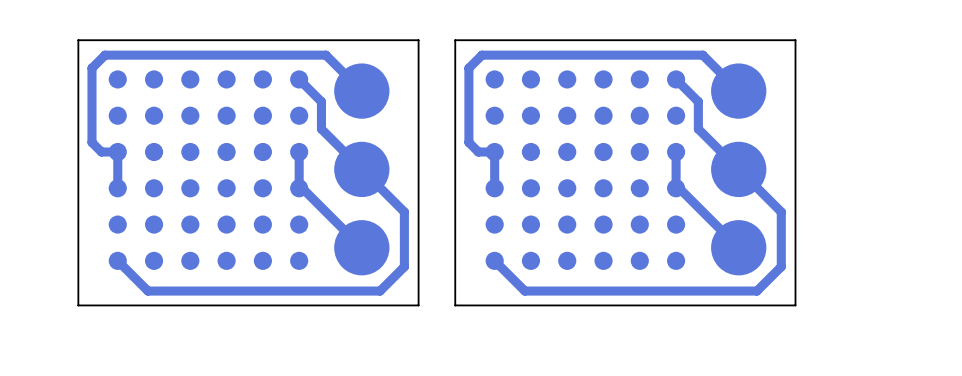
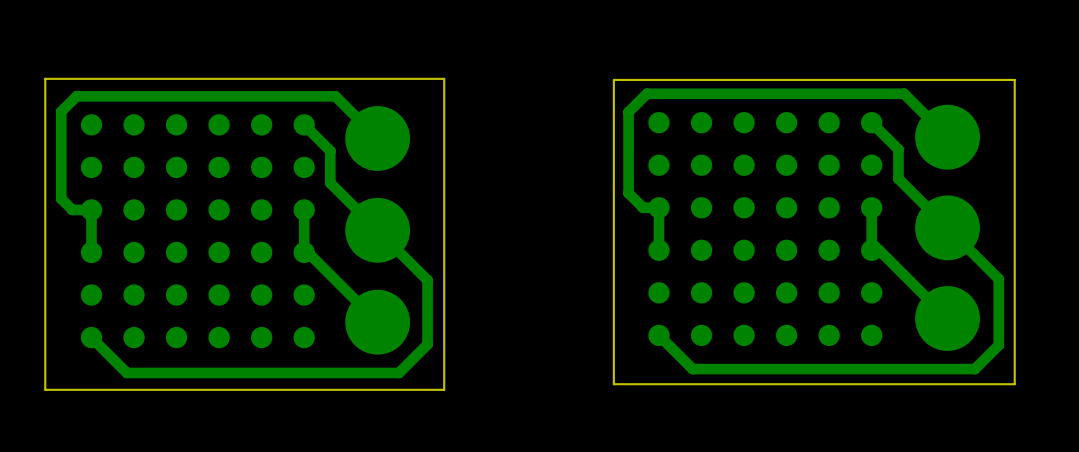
board edge: (455, 40) (795, 40) (795, 305) (455, 305) (455, 40) -> (613, 79) (613, 384) (1014, 384) (1014, 79) (613, 79)
bottom track: none -> (871, 122) (898, 149) (898, 178) (998, 279) (998, 345) (974, 369) (692, 369) (658, 335)
bottom track: (676, 79) (698, 101) (698, 129) (781, 211) (781, 266) (756, 291) (524, 291) (494, 260) -> none
bottom track: none -> (947, 137) (904, 93) (646, 93) (628, 112) (628, 193) (643, 207) (658, 207) (658, 250)
part: none -> (947, 137)
bottom track: (738, 91) (702, 55) (481, 55) (468, 68) (468, 142) (478, 152) (494, 152) -> none
part: (738, 91) -> none
bottom track: none -> (871, 207) (871, 250) (879, 250) (947, 318)
bottom track: (494, 152) (494, 188) -> none
bottom track: (676, 152) (676, 188) (679, 188) (738, 247) -> none
part: none -> (947, 227)
part: (738, 169) -> none
part position: (585, 170) -> (765, 229)
part: none -> (947, 318)
part: (738, 247) -> none

